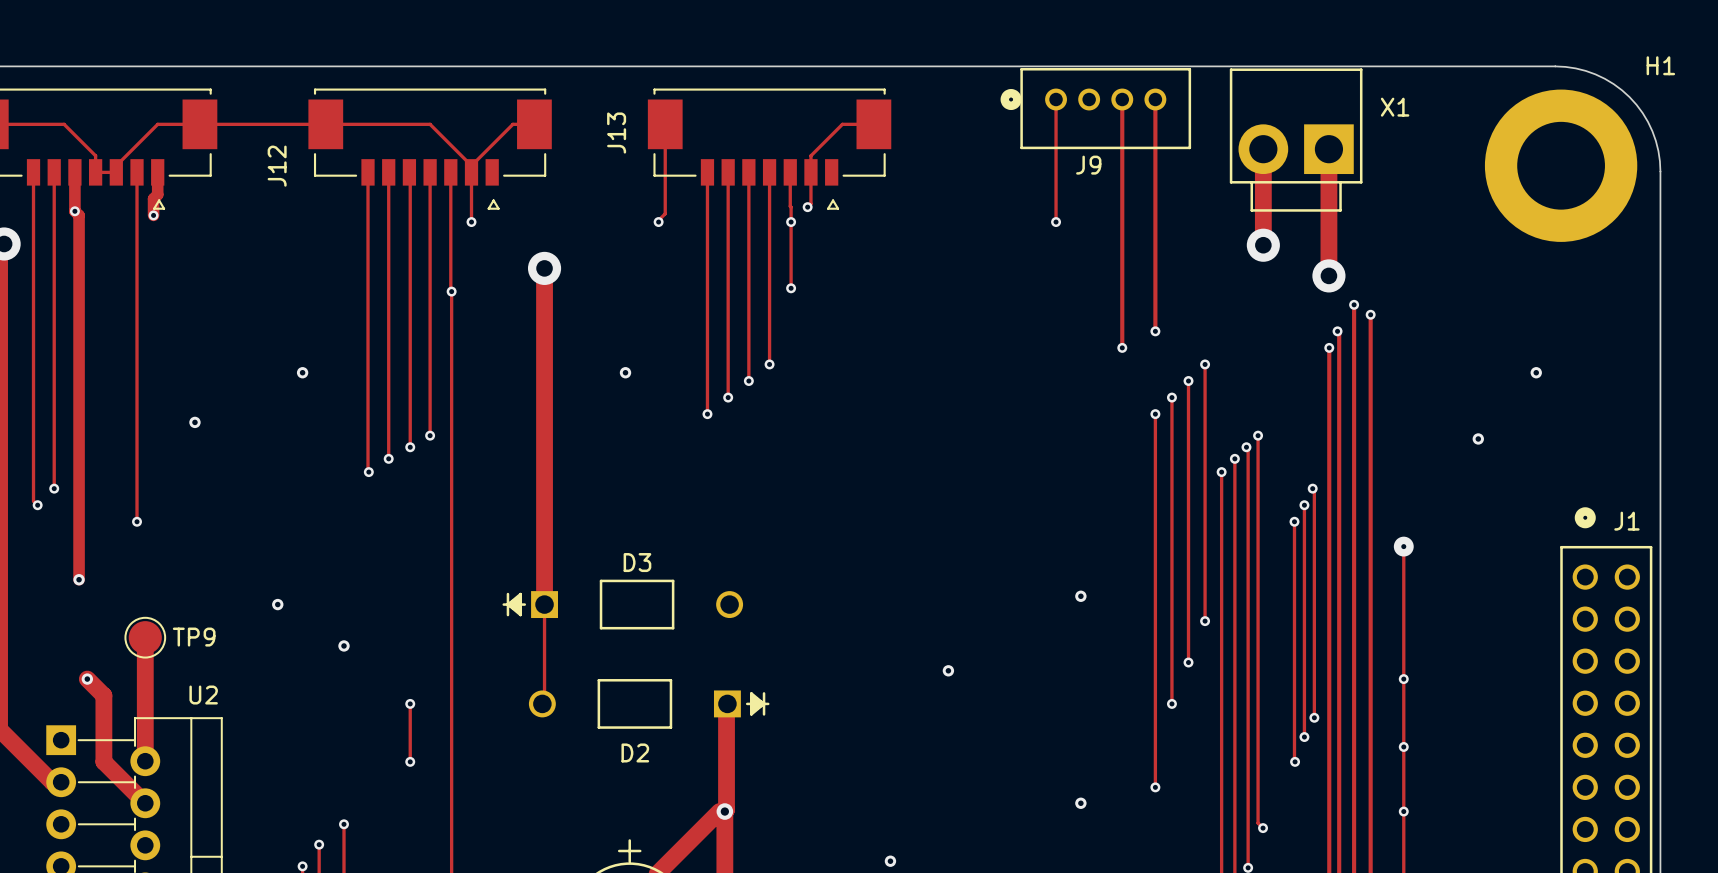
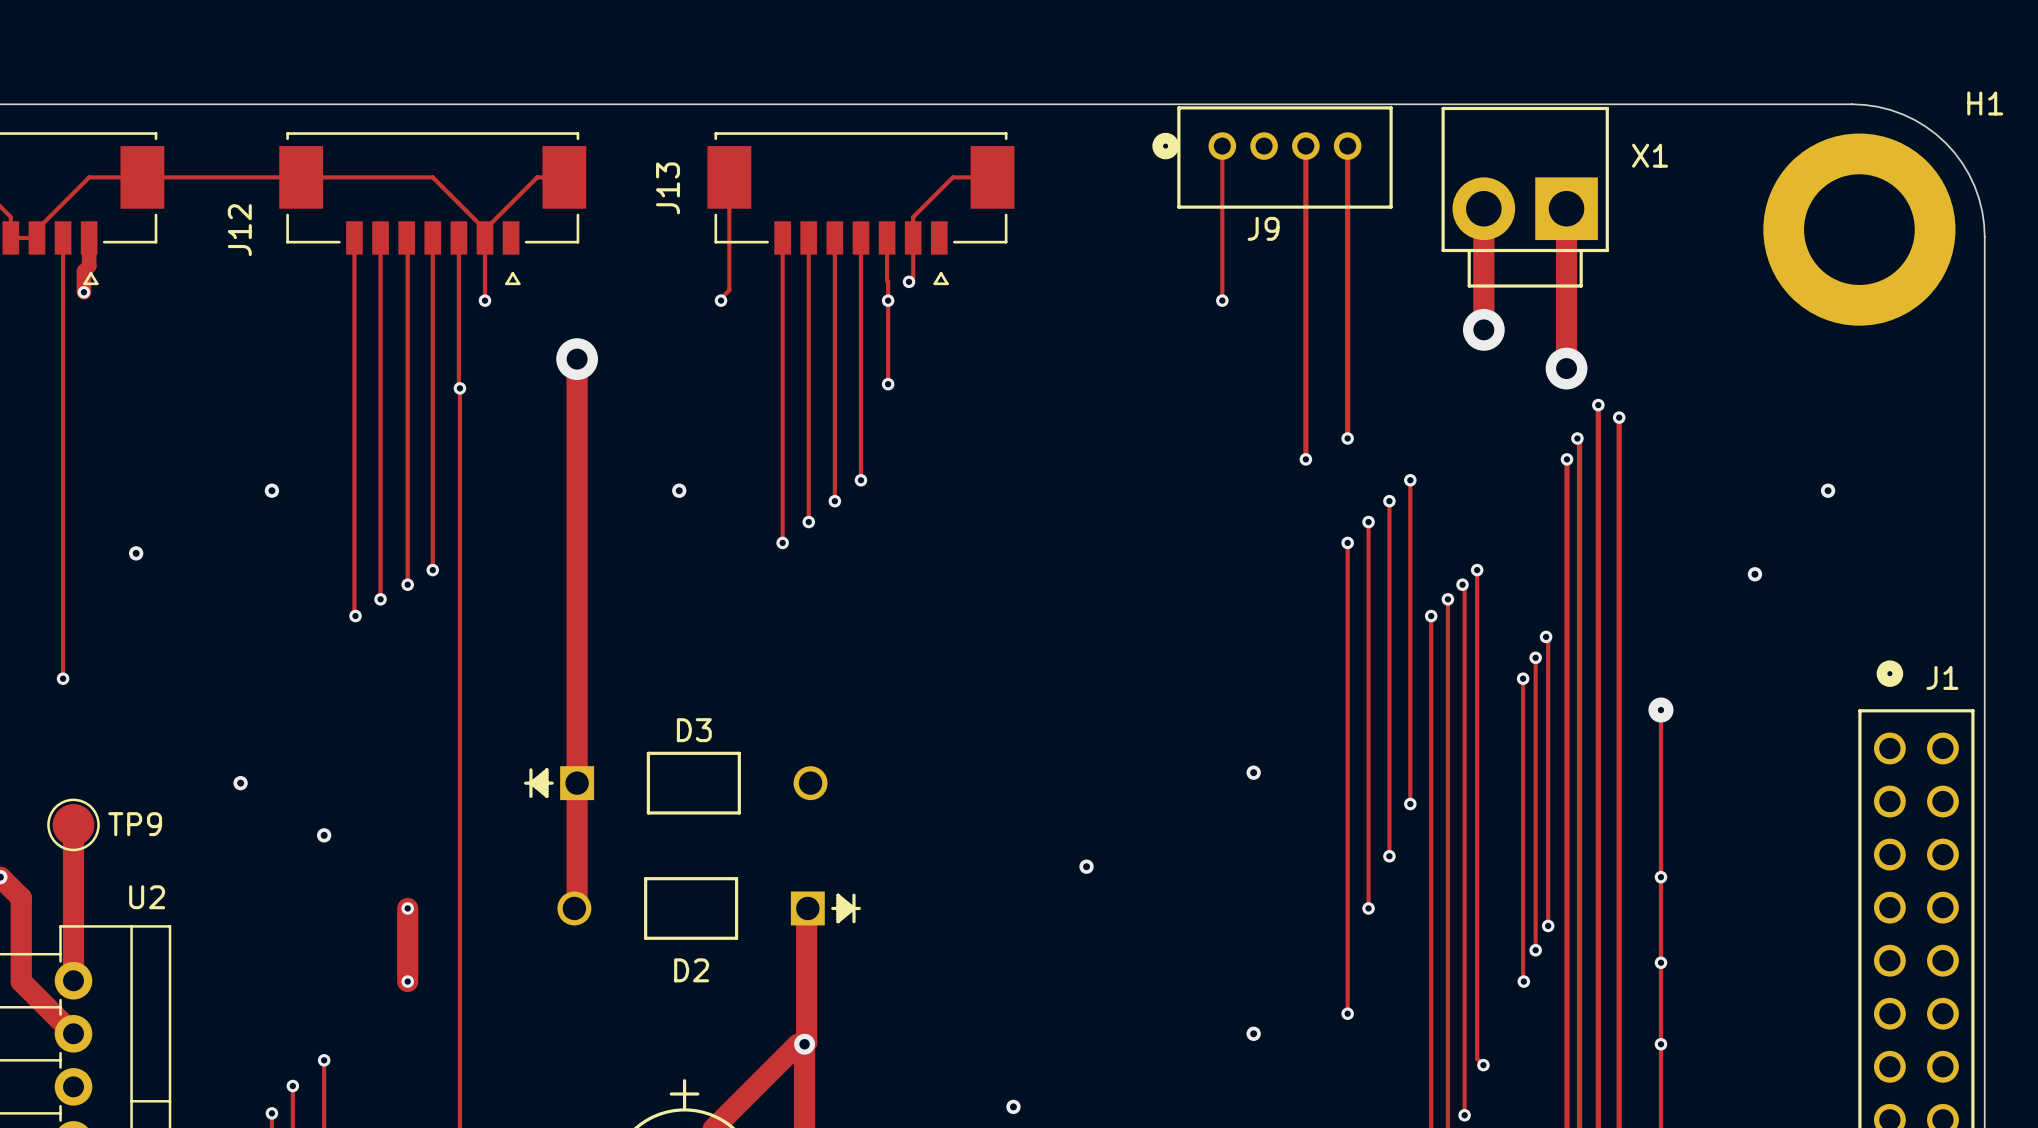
track width: thin (544, 604) (544, 702) -> thick (577, 783) (577, 906)
track width: thin (410, 703) (410, 761) -> thick (407, 908) (407, 981)

